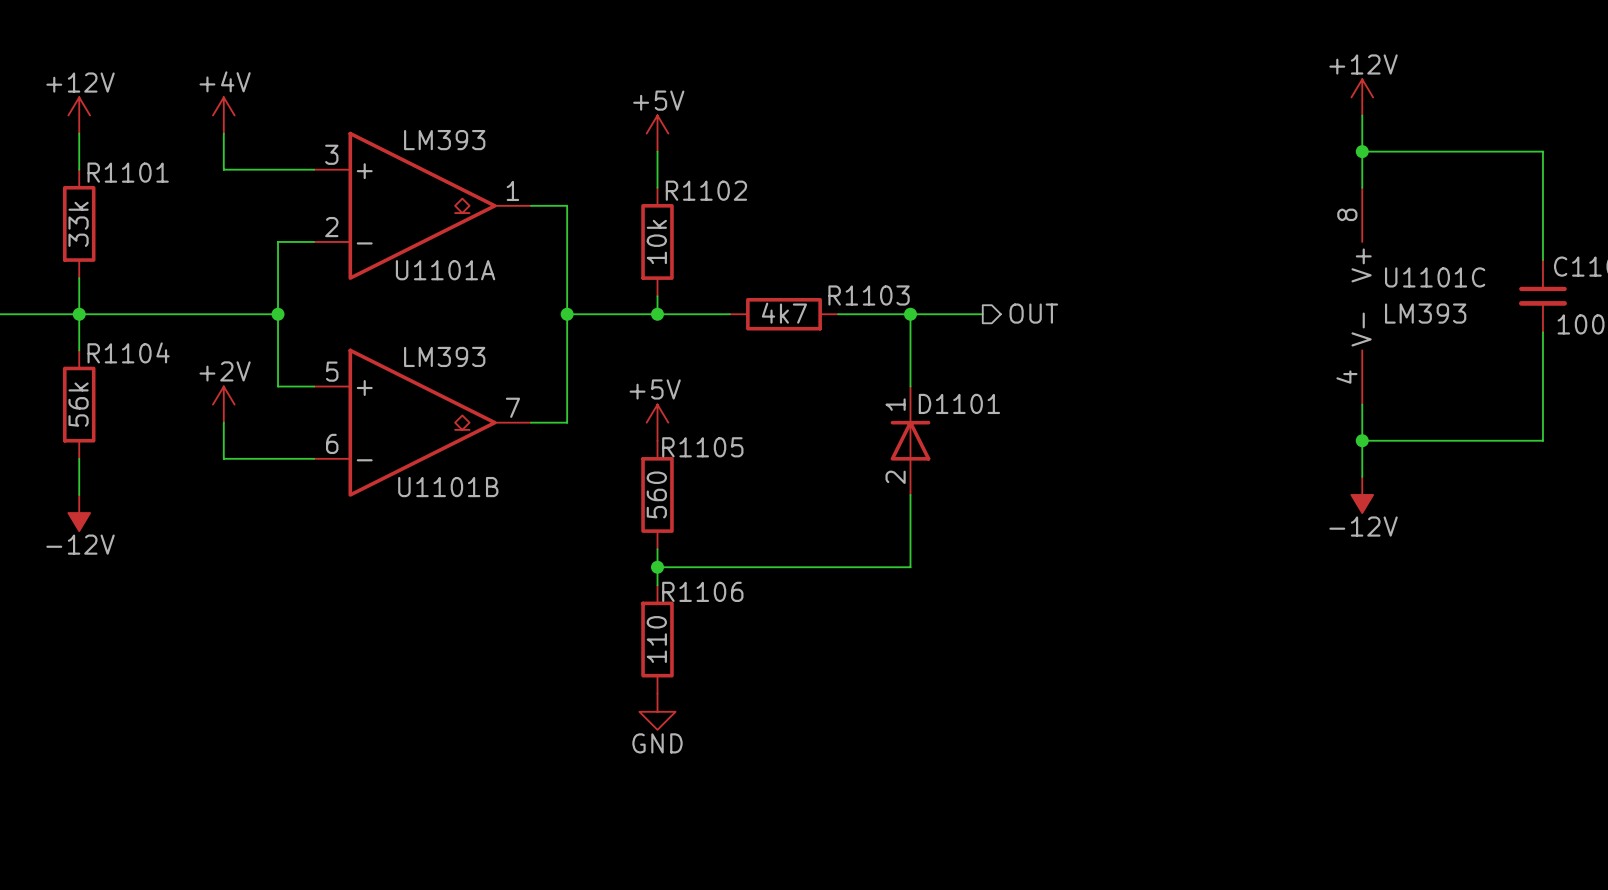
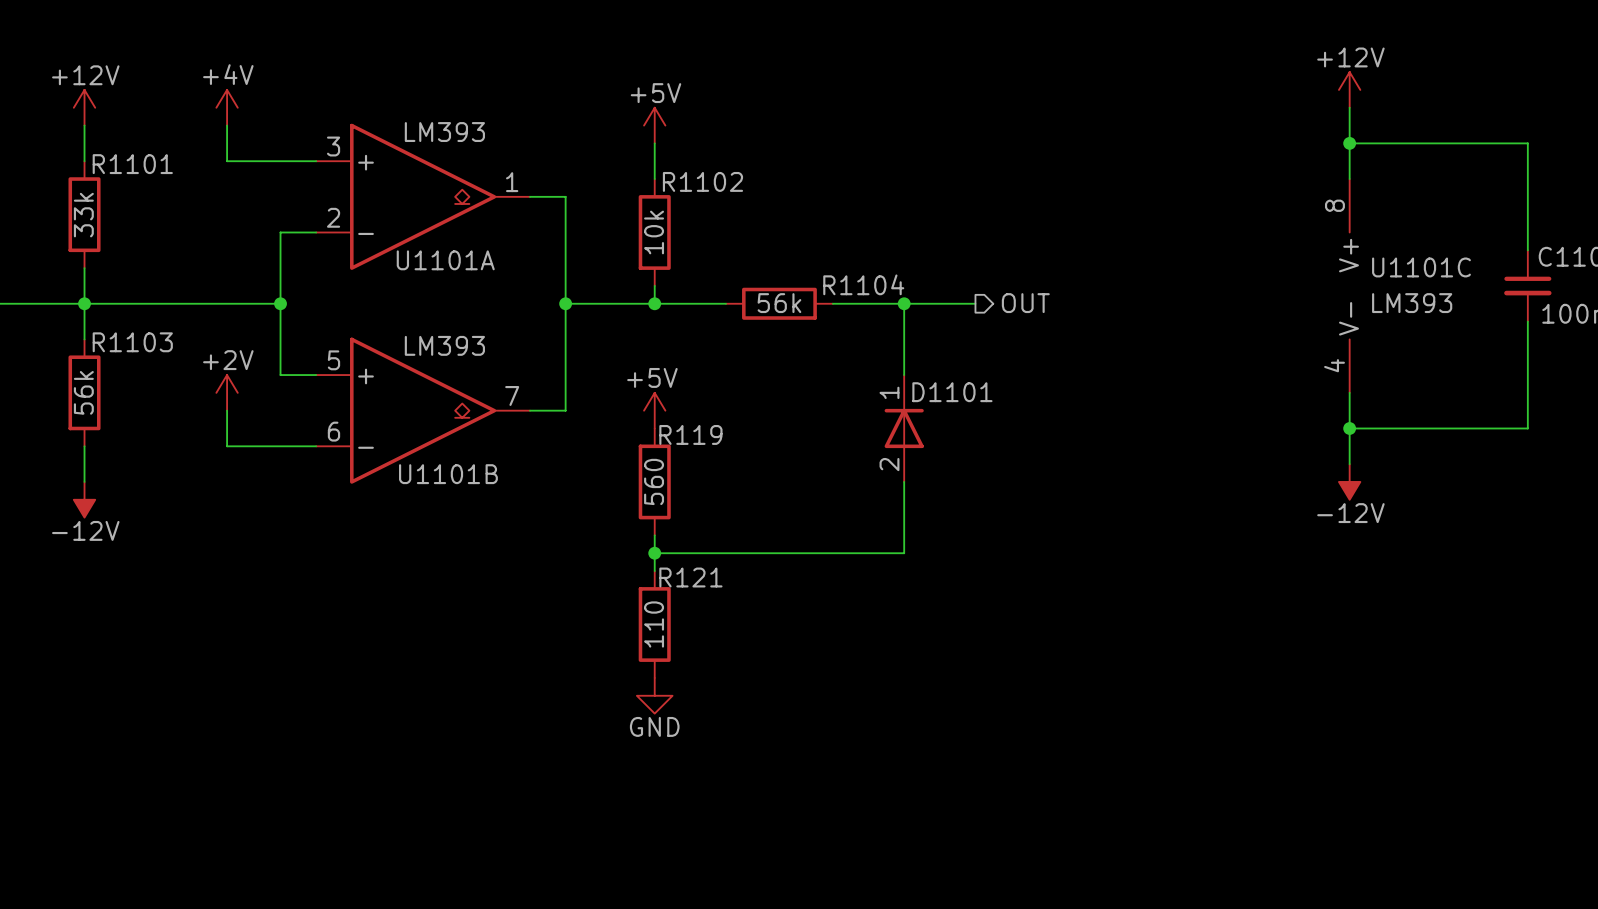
R1103 name: R1103 (869, 295) -> R1104 (863, 284)
R1103 value: 4k7 (784, 313) -> 56k (779, 303)
R1104 name: R1104 (128, 352) -> R1103 (132, 342)
R1105 name: R1105 (702, 447) -> R119 (690, 434)
R1106 name: R1106 (702, 591) -> R121 (690, 577)

